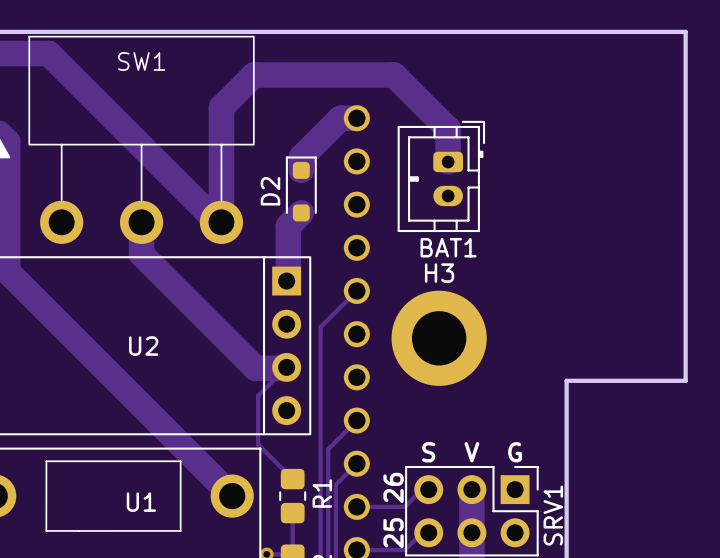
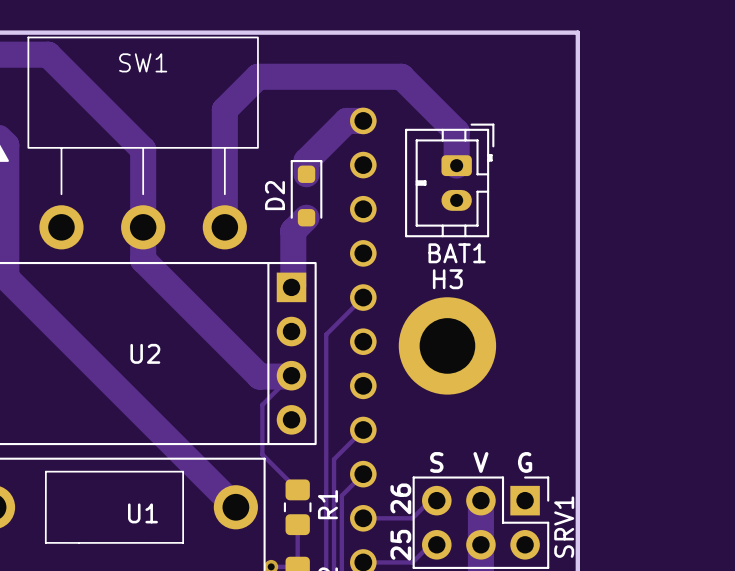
board edge: (566, 31) (685, 31) (685, 380) (566, 380) -> (577, 32) (577, 389)
SW1 footprint: [28, 35, 255, 244] -> [27, 36, 259, 250]
track: (141, 146) (217, 222) (221, 222) -> (143, 149) (143, 227)

